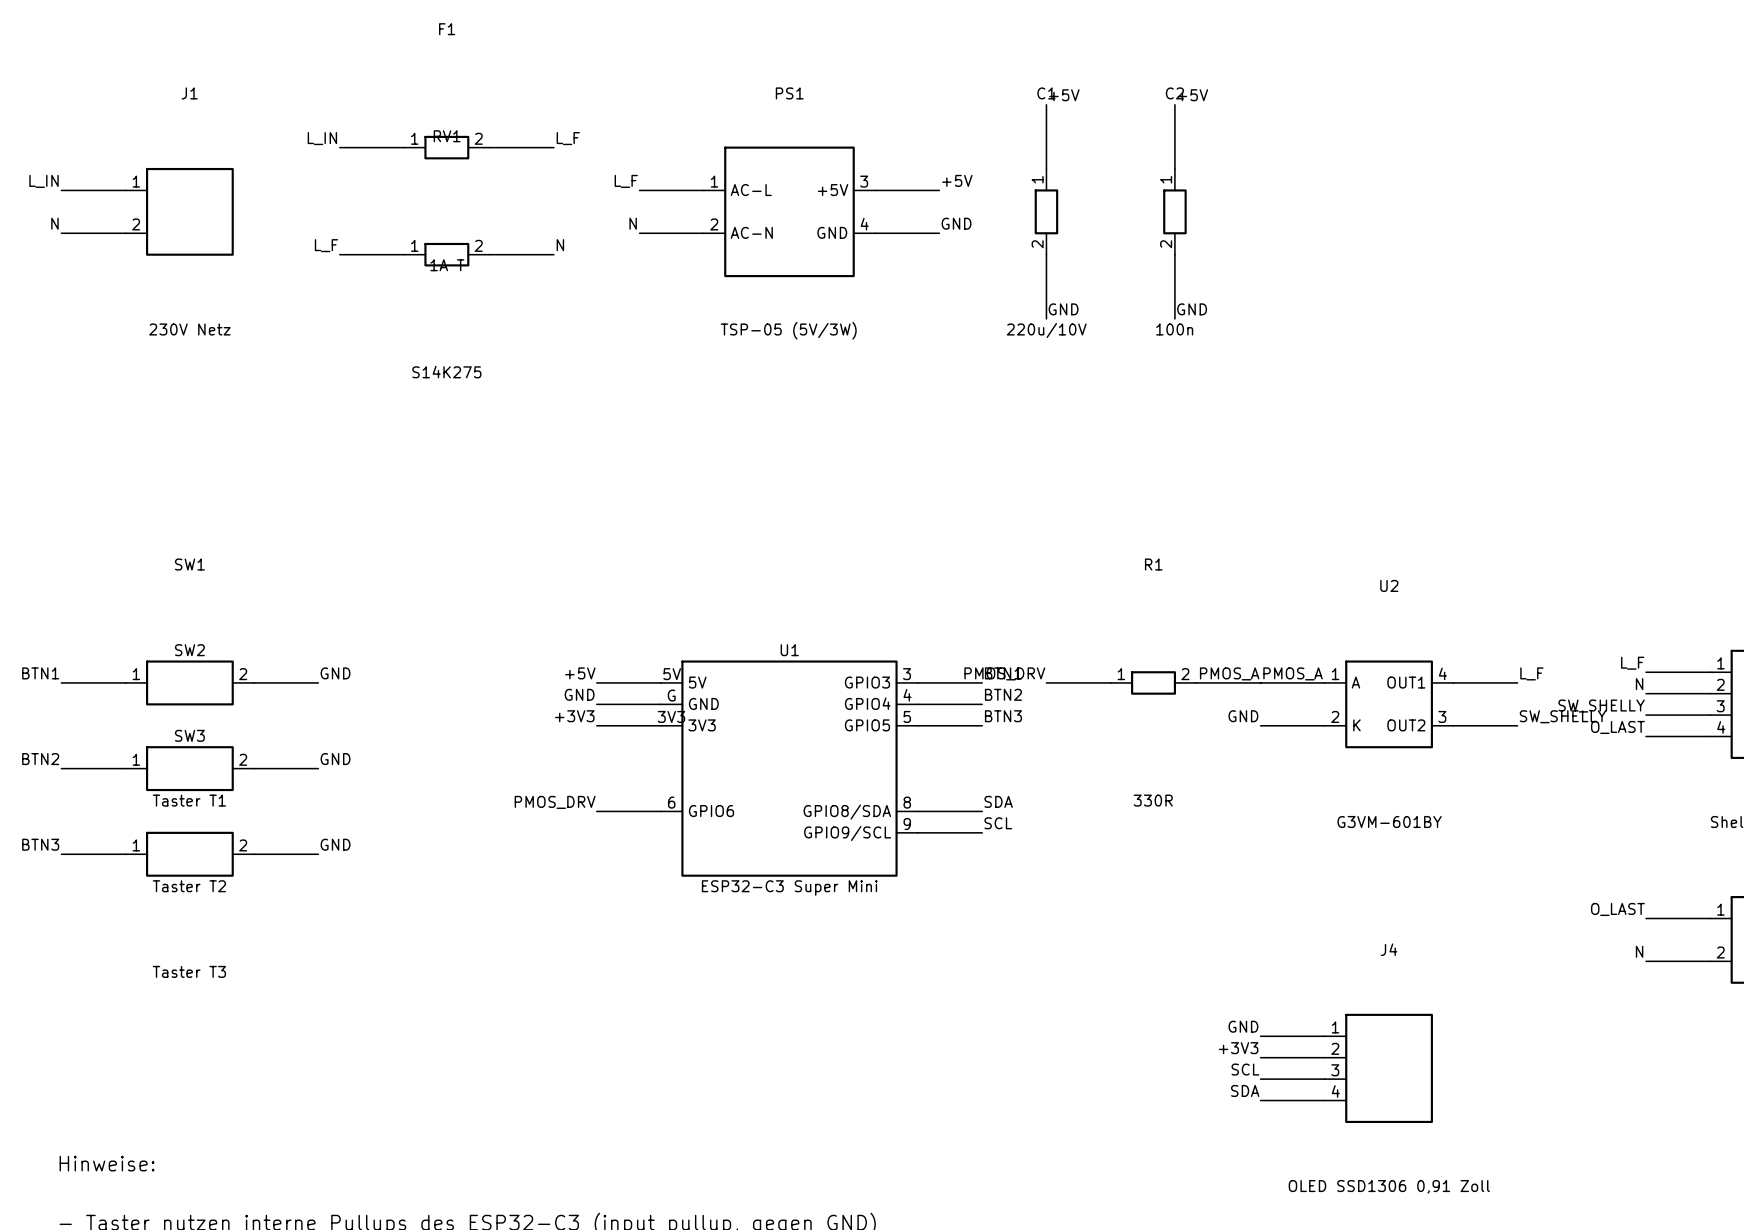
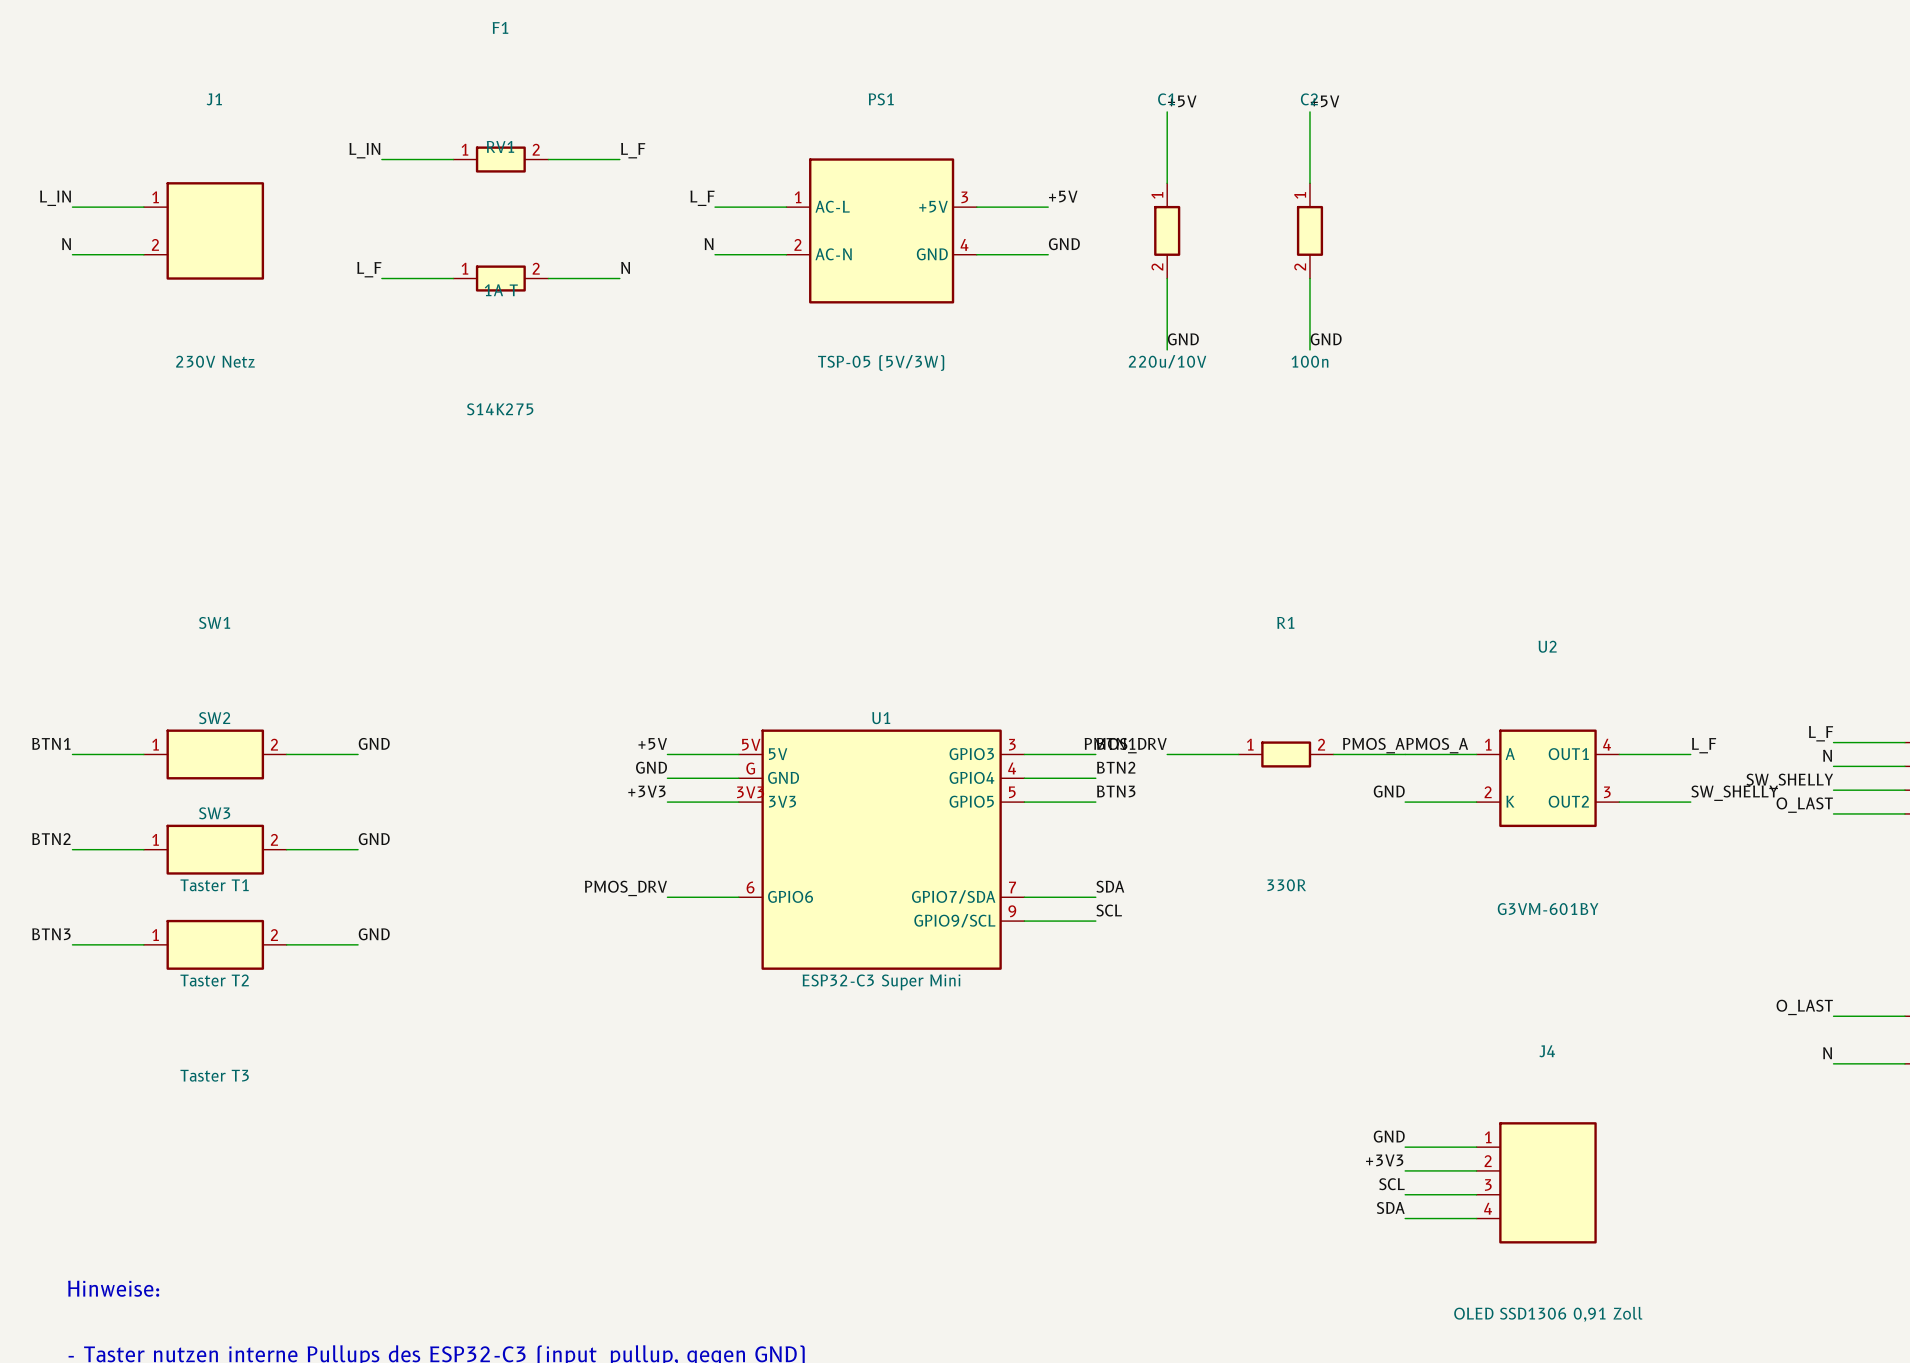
U1 pin number: 8 (907, 802) -> 7 (1012, 887)
U1 pin name: GPIO8/SDA (847, 812) -> GPIO7/SDA (953, 896)

